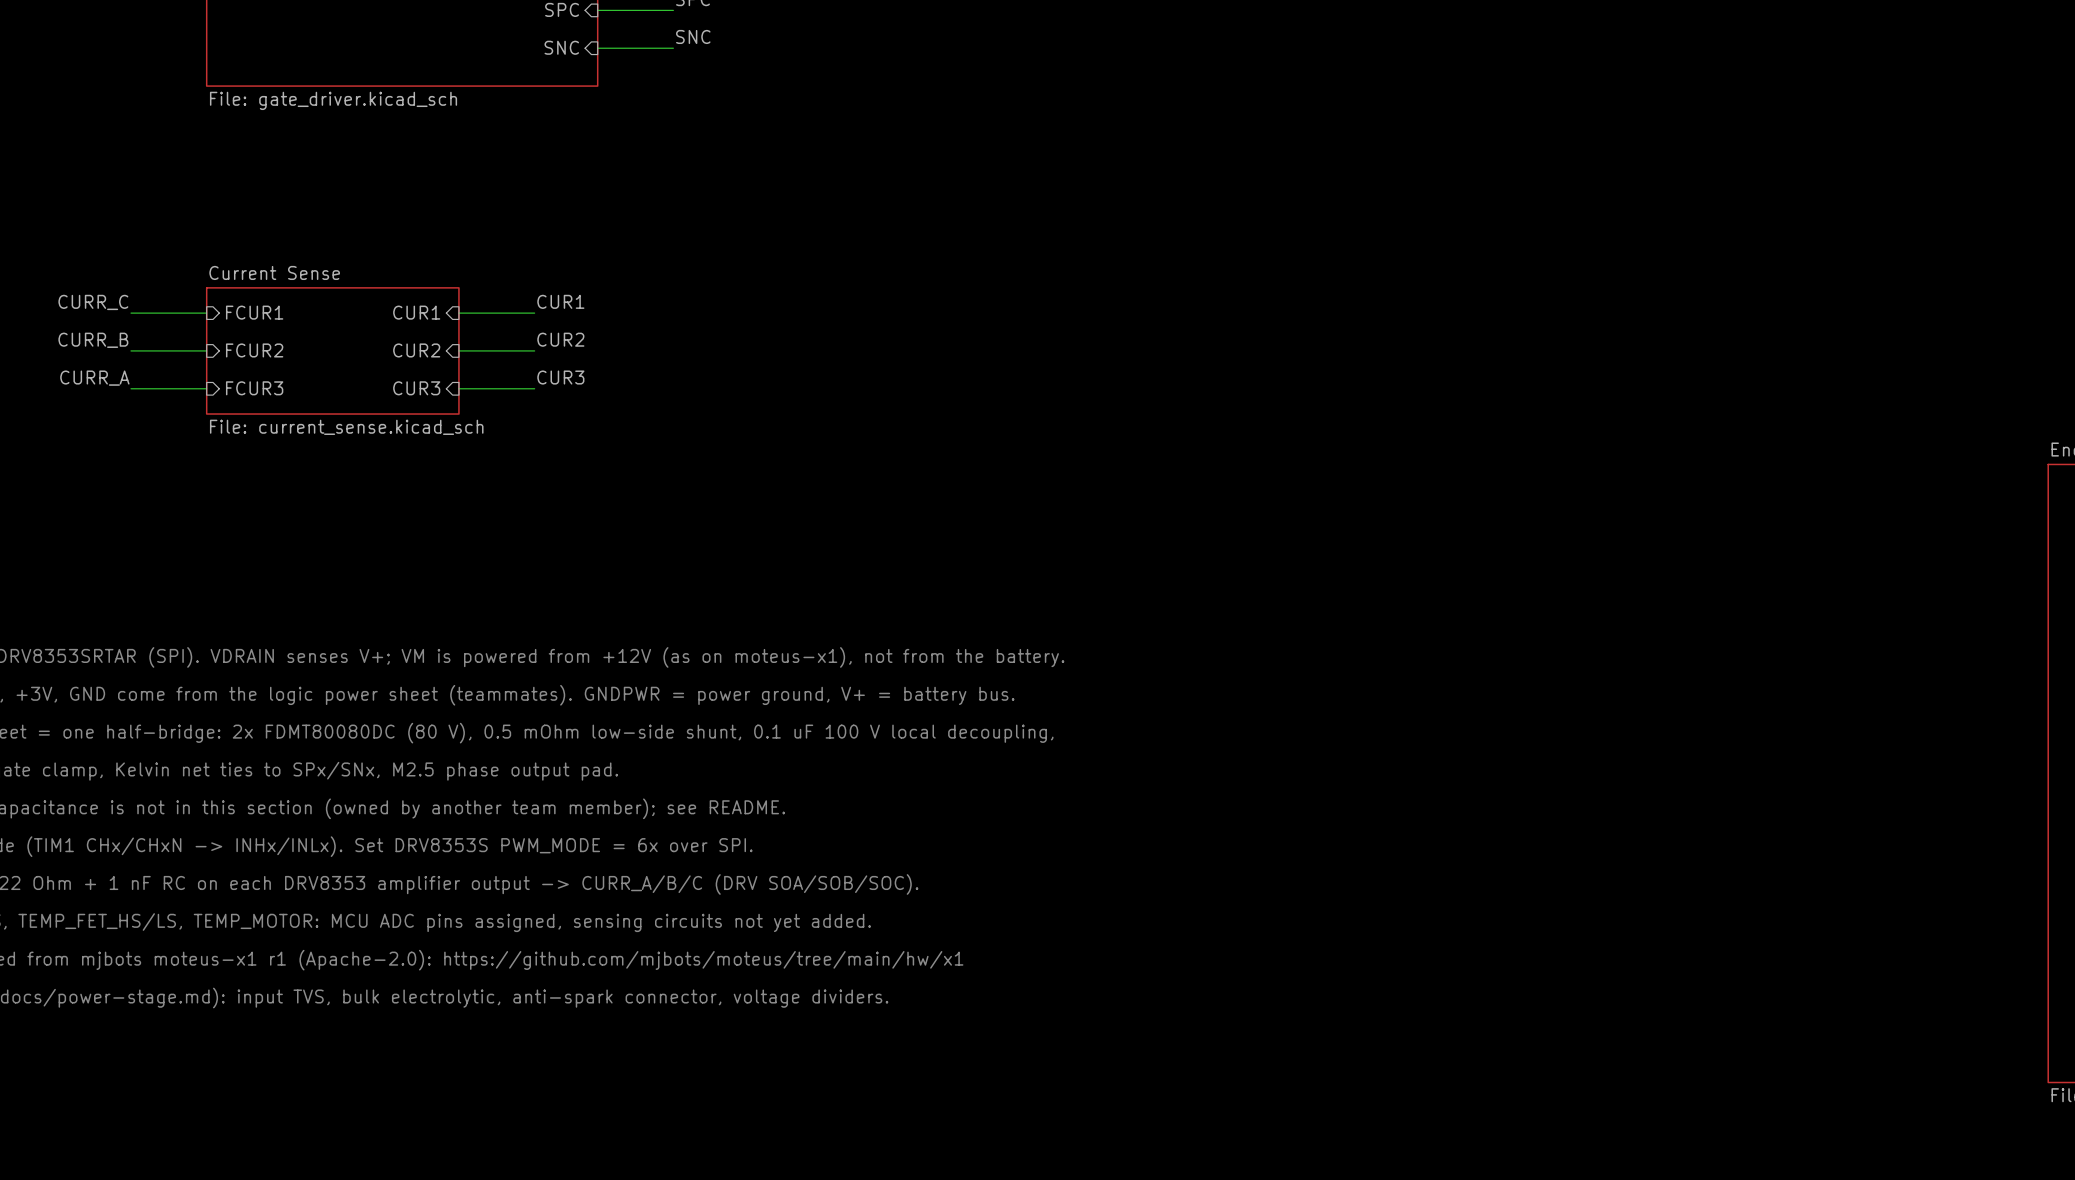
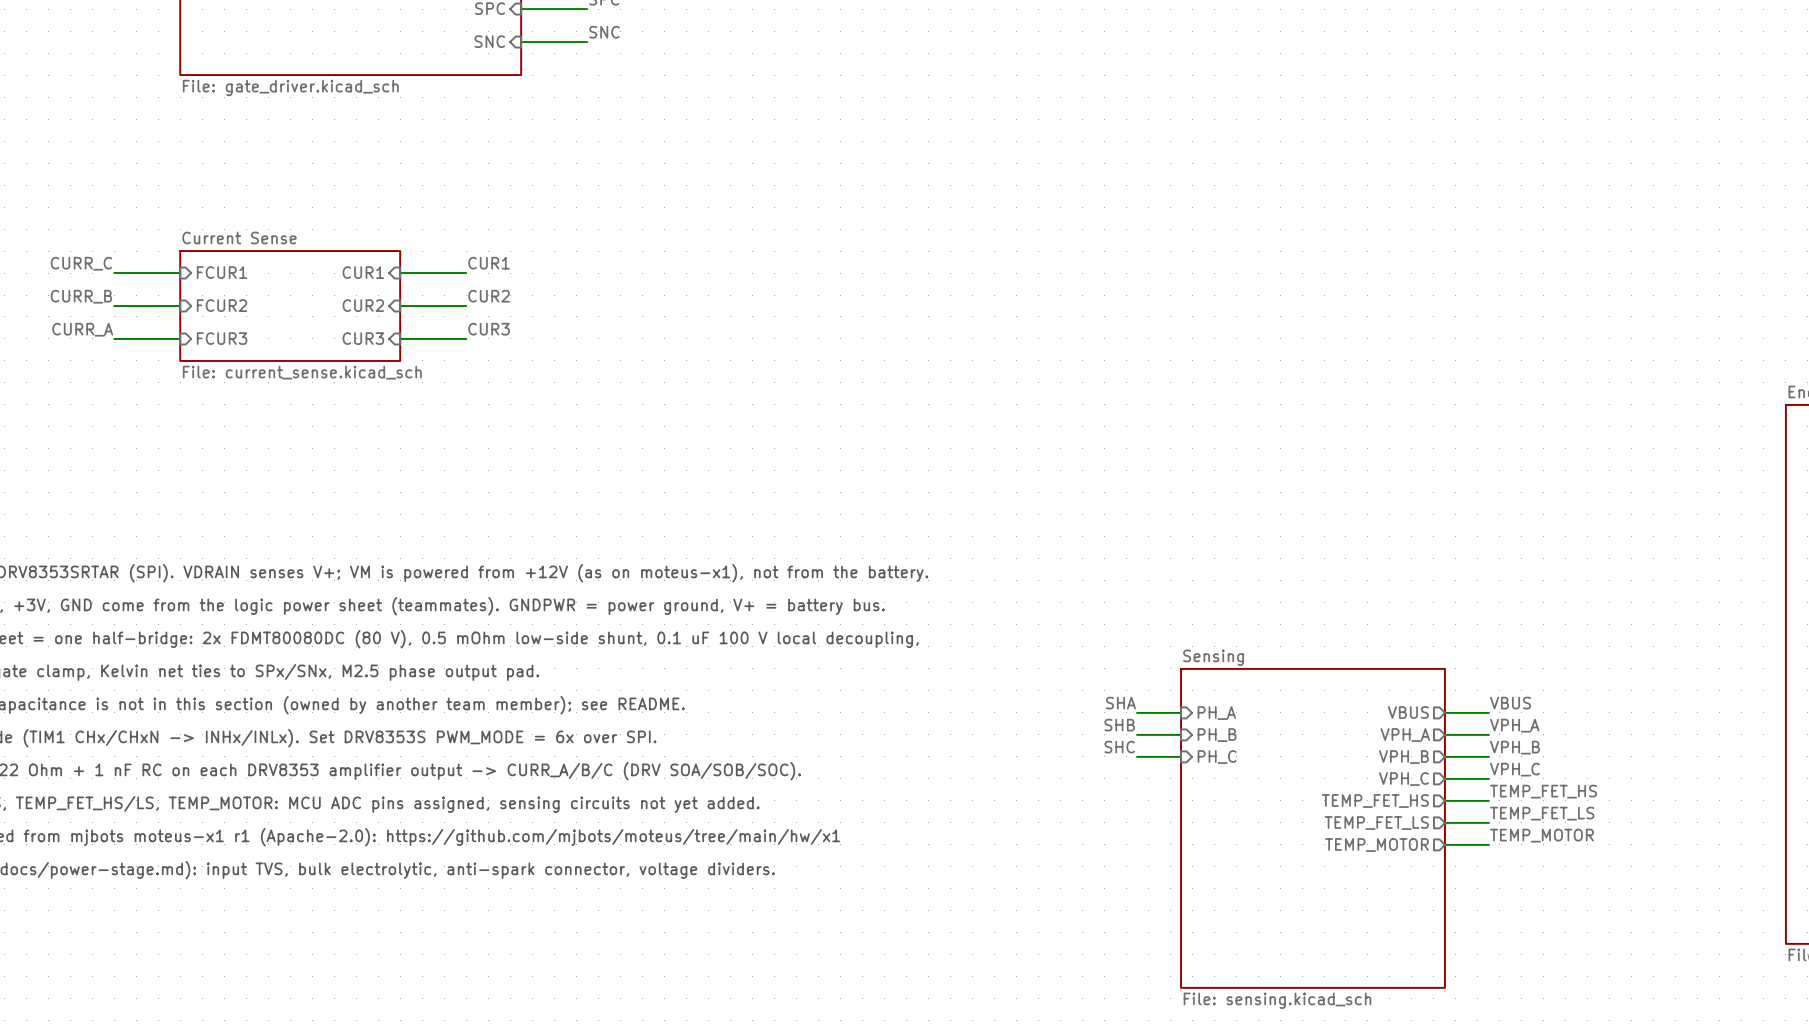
label: none -> SHA (1120, 703)
label: none -> VBUS (1510, 703)
wire: none -> (1137, 712) (1181, 712)
sheet pin: none -> PH_A (1216, 713)
sheet pin: none -> VBUS (1408, 712)
wire: none -> (1444, 712) (1488, 712)
label: none -> SHB (1119, 725)
label: none -> VPH_A (1514, 725)
wire: none -> (1137, 734) (1181, 734)
sheet pin: none -> PH_B (1217, 735)
sheet pin: none -> VPH_A (1405, 735)
wire: none -> (1444, 734) (1488, 734)
label: none -> SHC (1119, 747)
label: none -> VPH_B (1514, 747)
wire: none -> (1137, 756) (1181, 756)
sheet pin: none -> PH_C (1217, 757)
sheet pin: none -> VPH_B (1403, 757)
wire: none -> (1444, 756) (1488, 756)
label: none -> VPH_C (1514, 769)
sheet pin: none -> VPH_C (1403, 779)
wire: none -> (1444, 778) (1488, 778)
label: none -> TEMP_FET_HS (1543, 791)
sheet pin: none -> TEMP_FET_HS (1375, 801)
wire: none -> (1444, 800) (1488, 800)
label: none -> TEMP_FET_LS (1542, 813)
sheet pin: none -> TEMP_FET_LS (1376, 823)
wire: none -> (1444, 822) (1488, 822)
sheet Sensing: none -> File: sensing.kicad_sch (1313, 828)
label: none -> TEMP_MOTOR (1541, 835)
wire: none -> (1444, 844) (1488, 844)
sheet pin: none -> TEMP_MOTOR (1376, 845)

